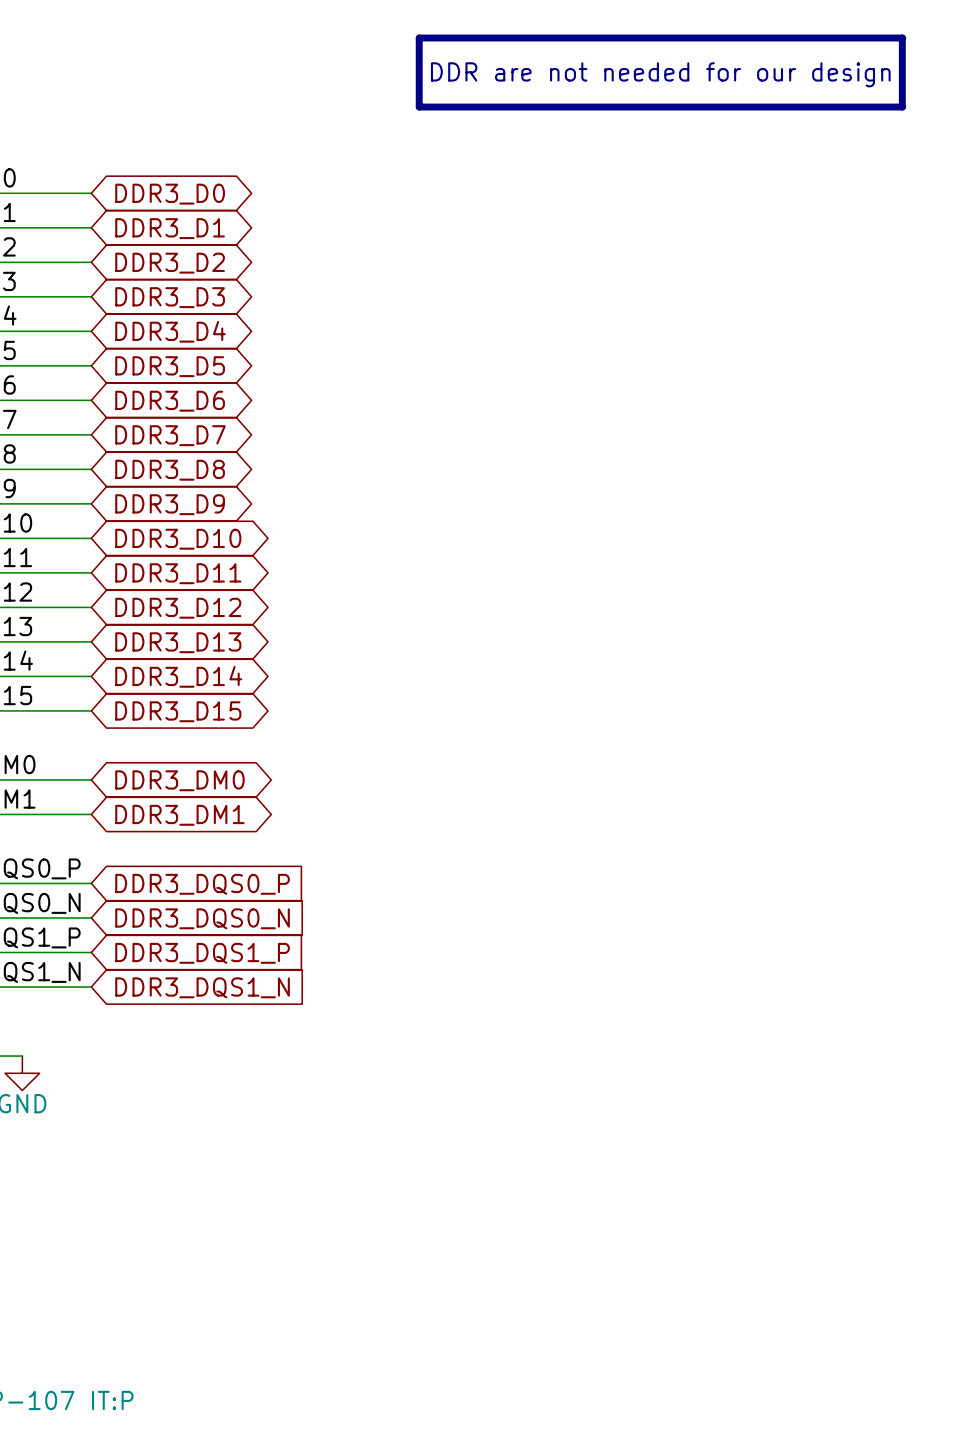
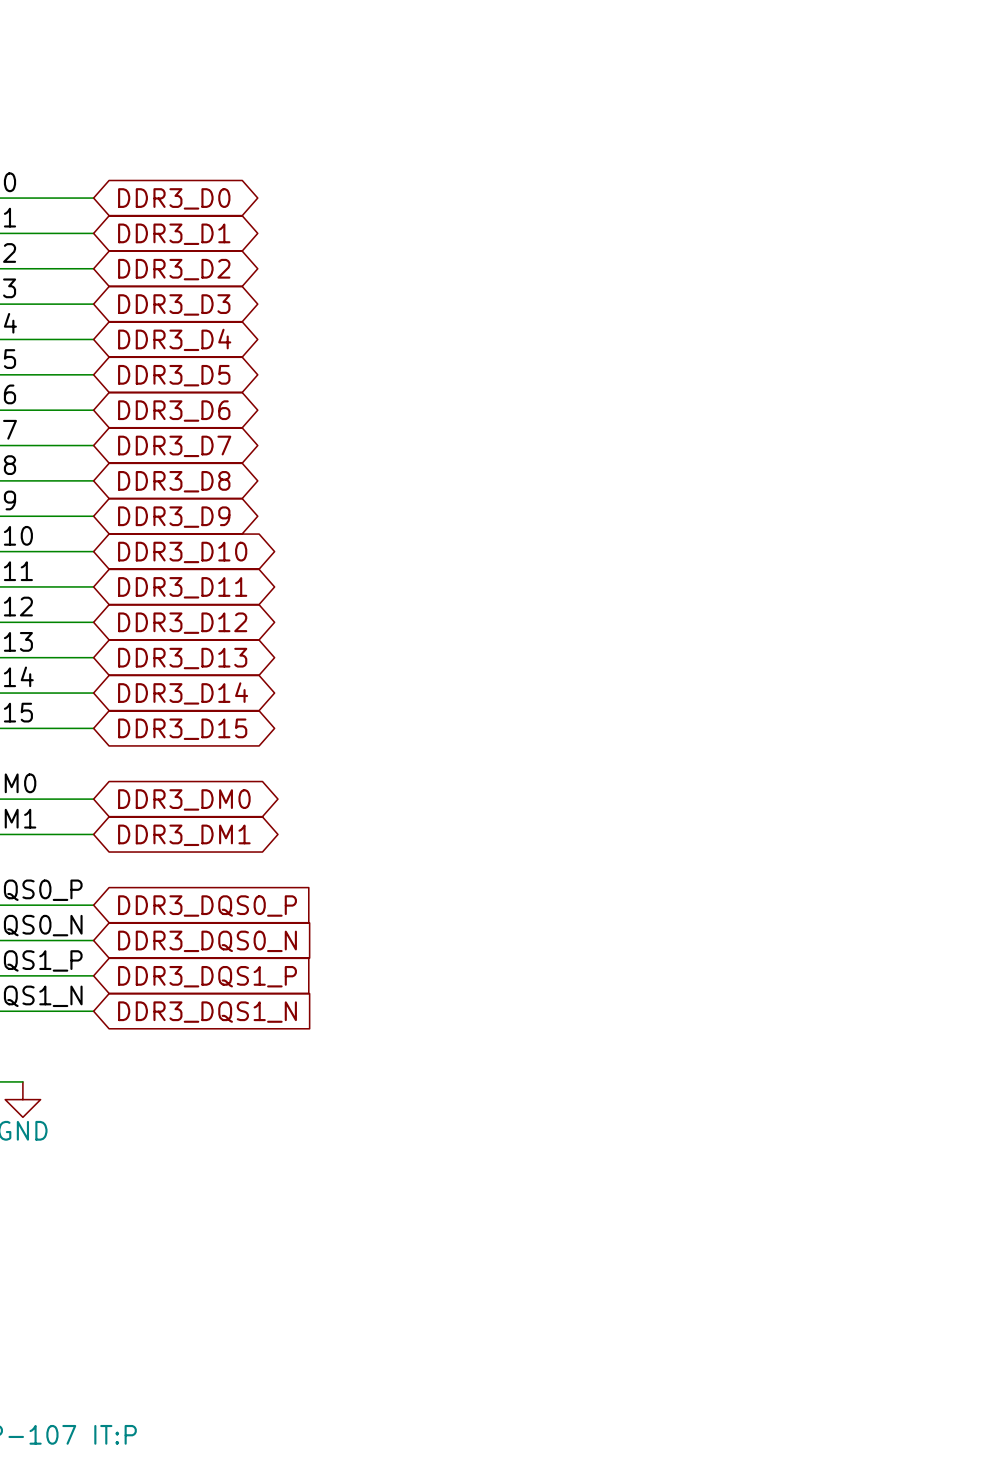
line: (419, 38) (902, 38) (902, 107) (419, 107) (419, 38) -> none
text: DDR are not needed for our design (660, 74) -> none

